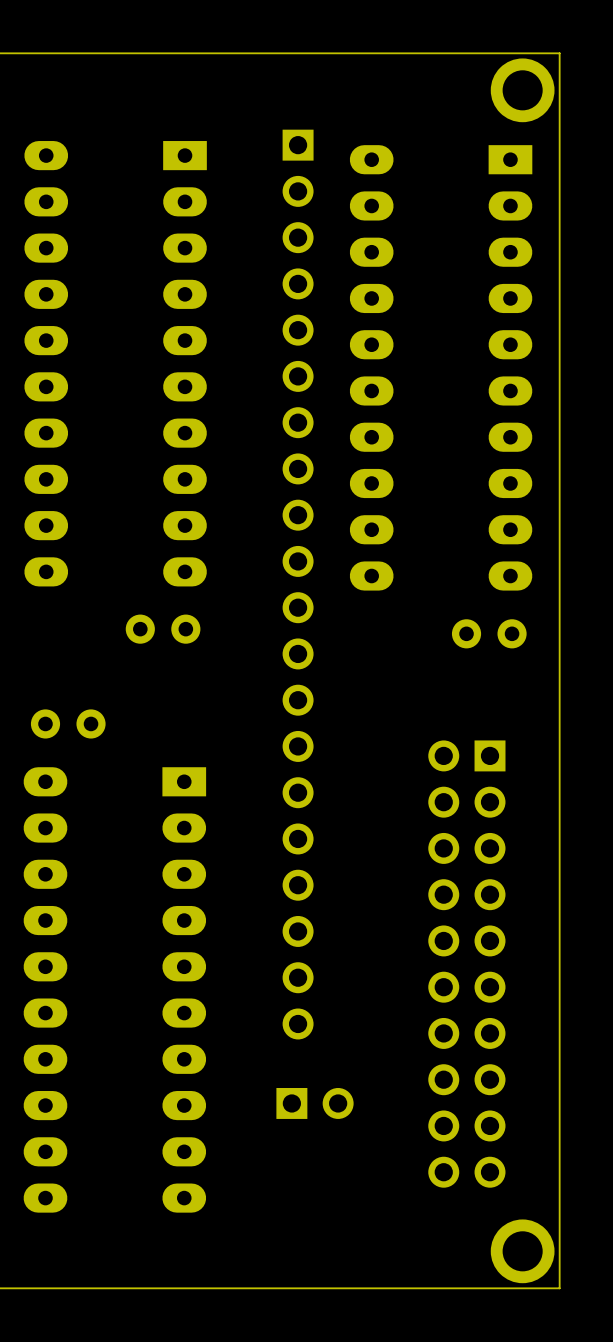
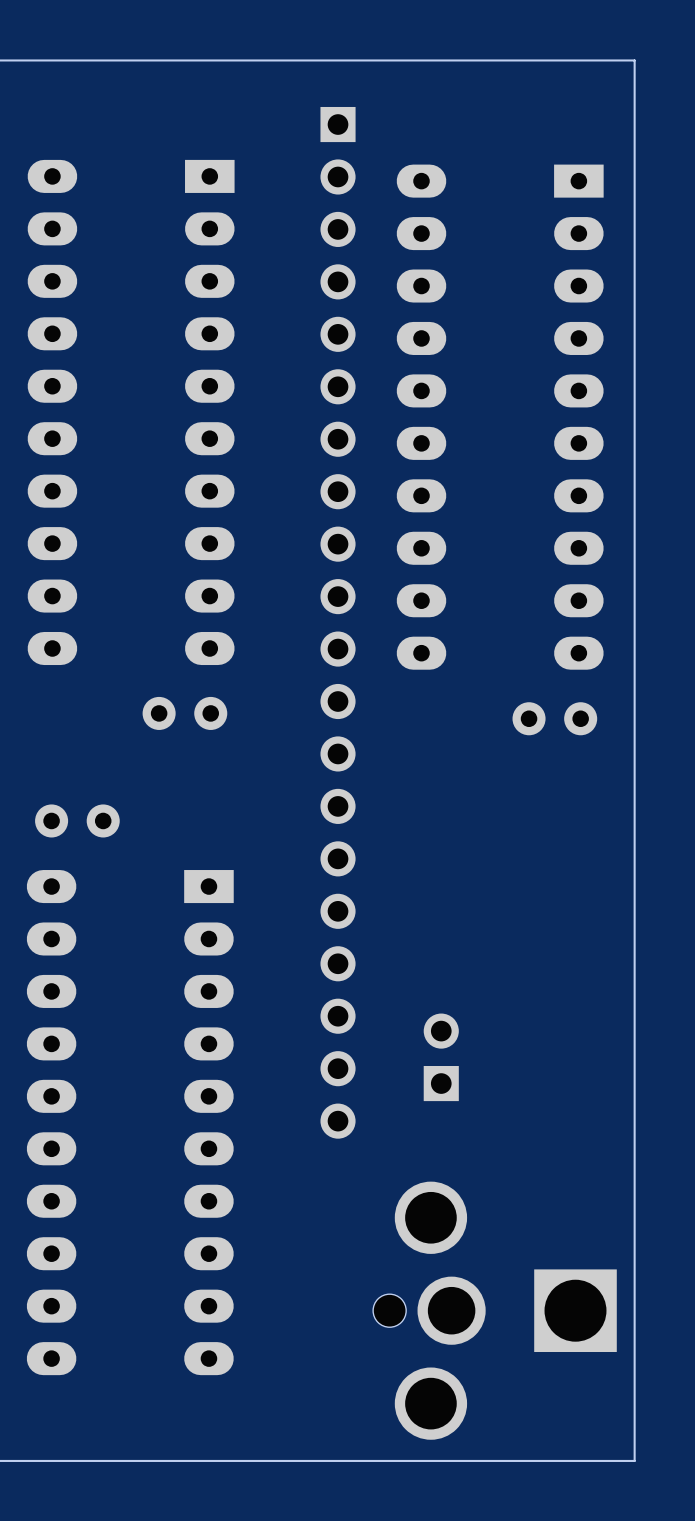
part: (522, 90) -> none
part position: (298, 584) -> (338, 622)
part: (466, 964) -> none
part rotation: 0° (315, 1103) -> 90° counterclockwise (441, 1057)
part position: (315, 1103) -> (441, 1057)
part: none -> (494, 1310)
part: (522, 1251) -> none

